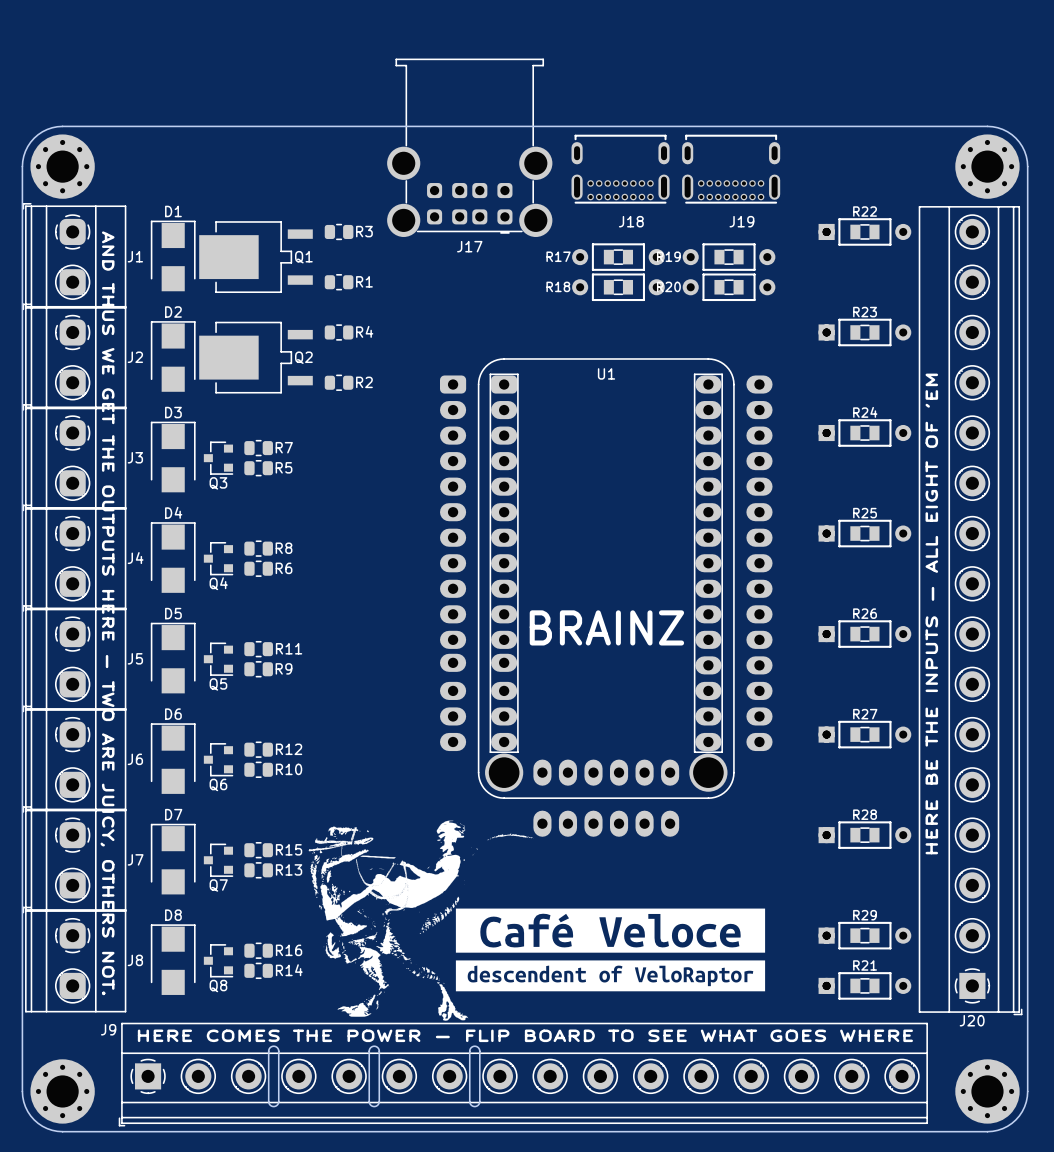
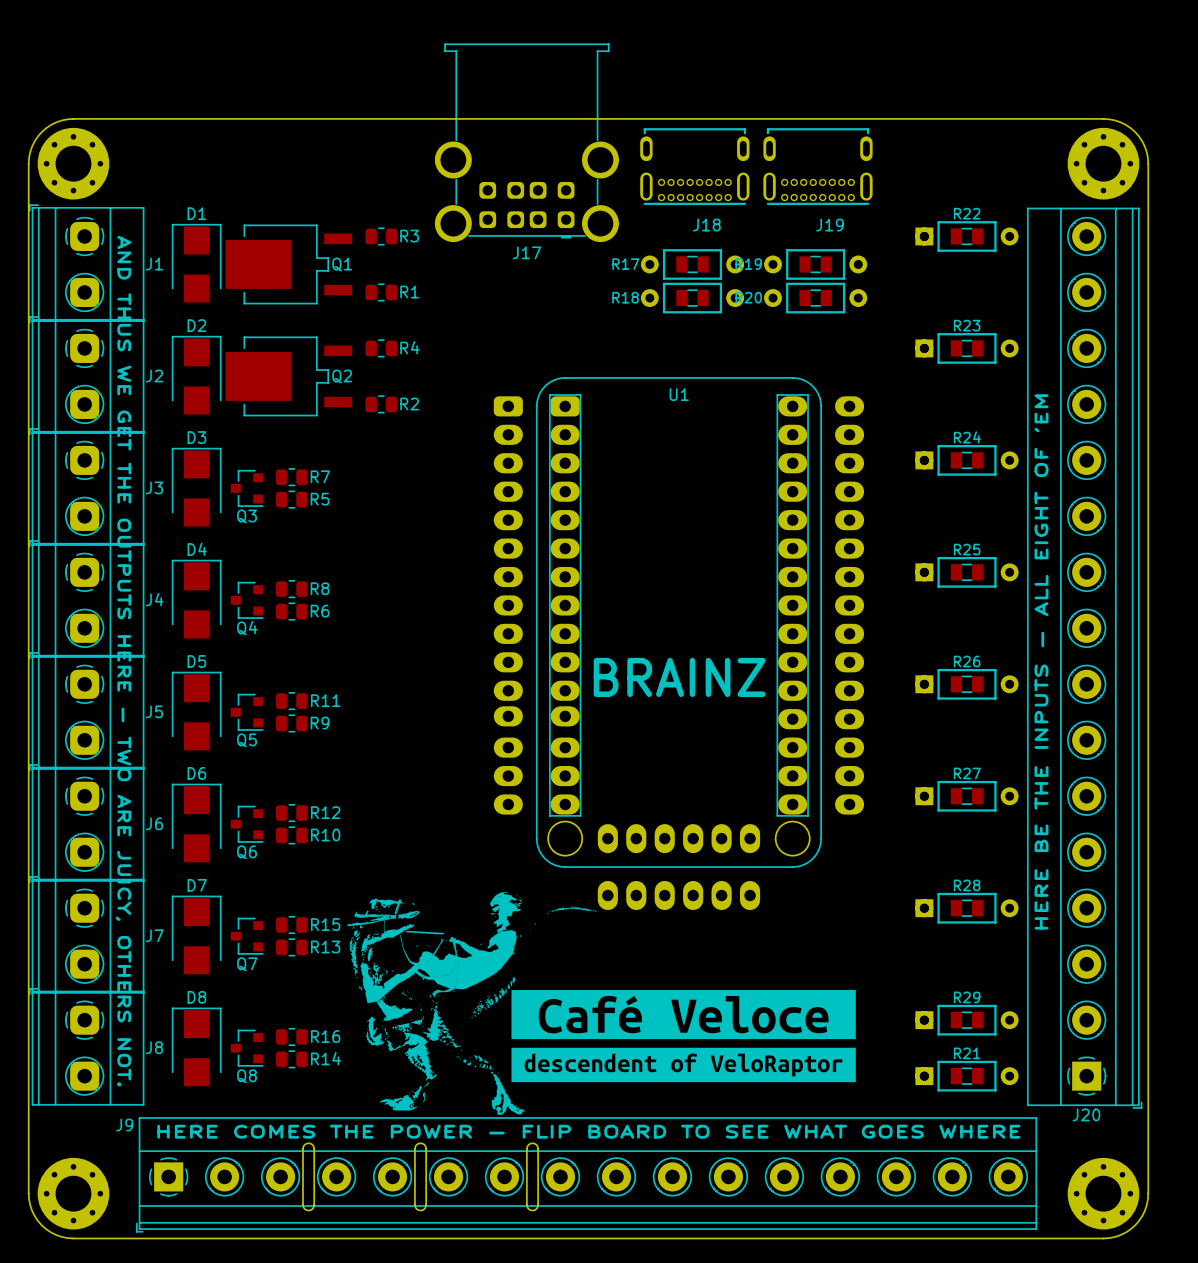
U1 footprint: [440, 358, 786, 837] -> [493, 377, 879, 911]

